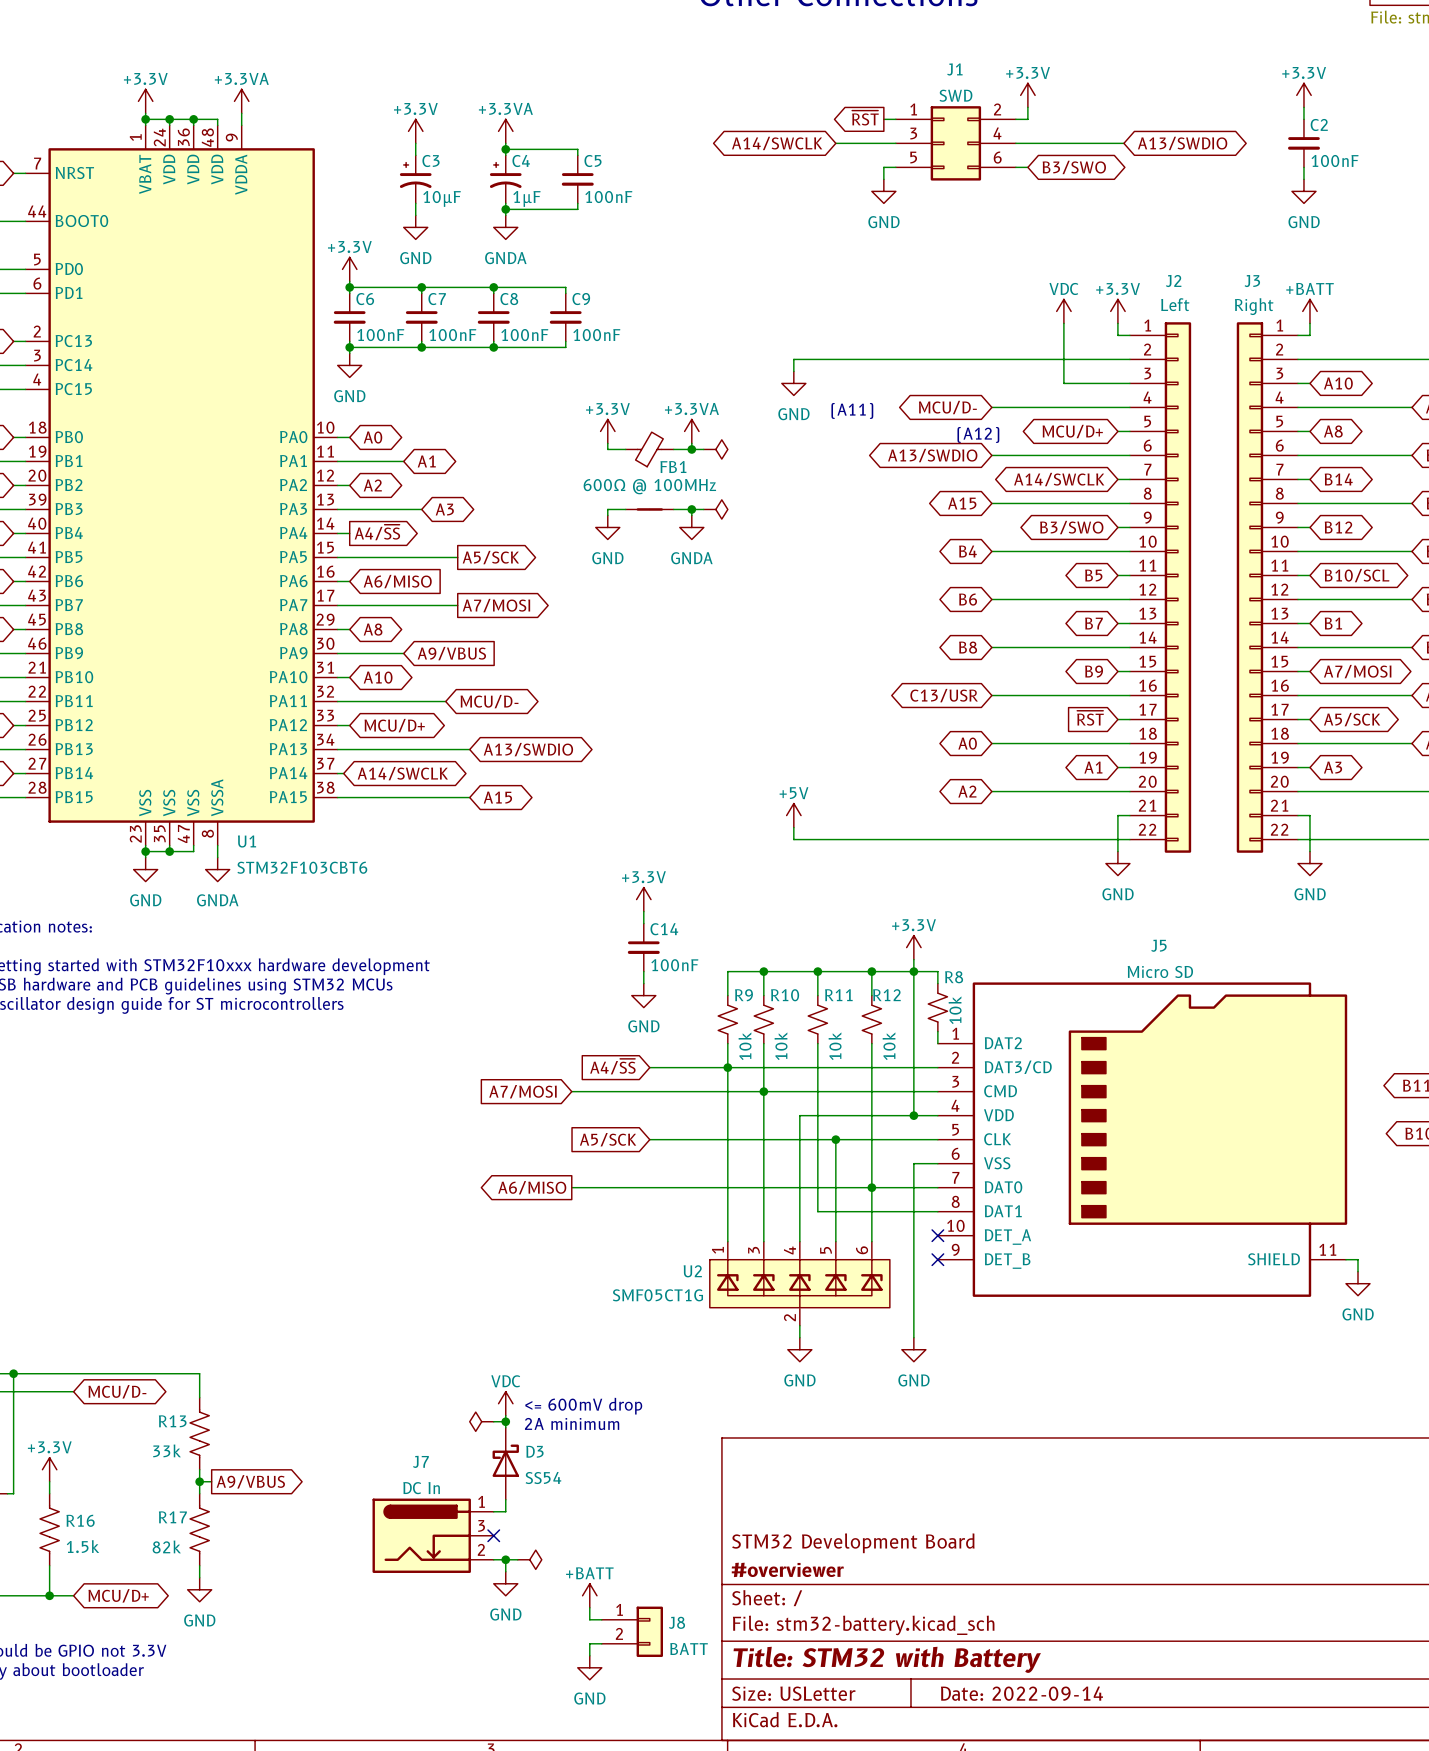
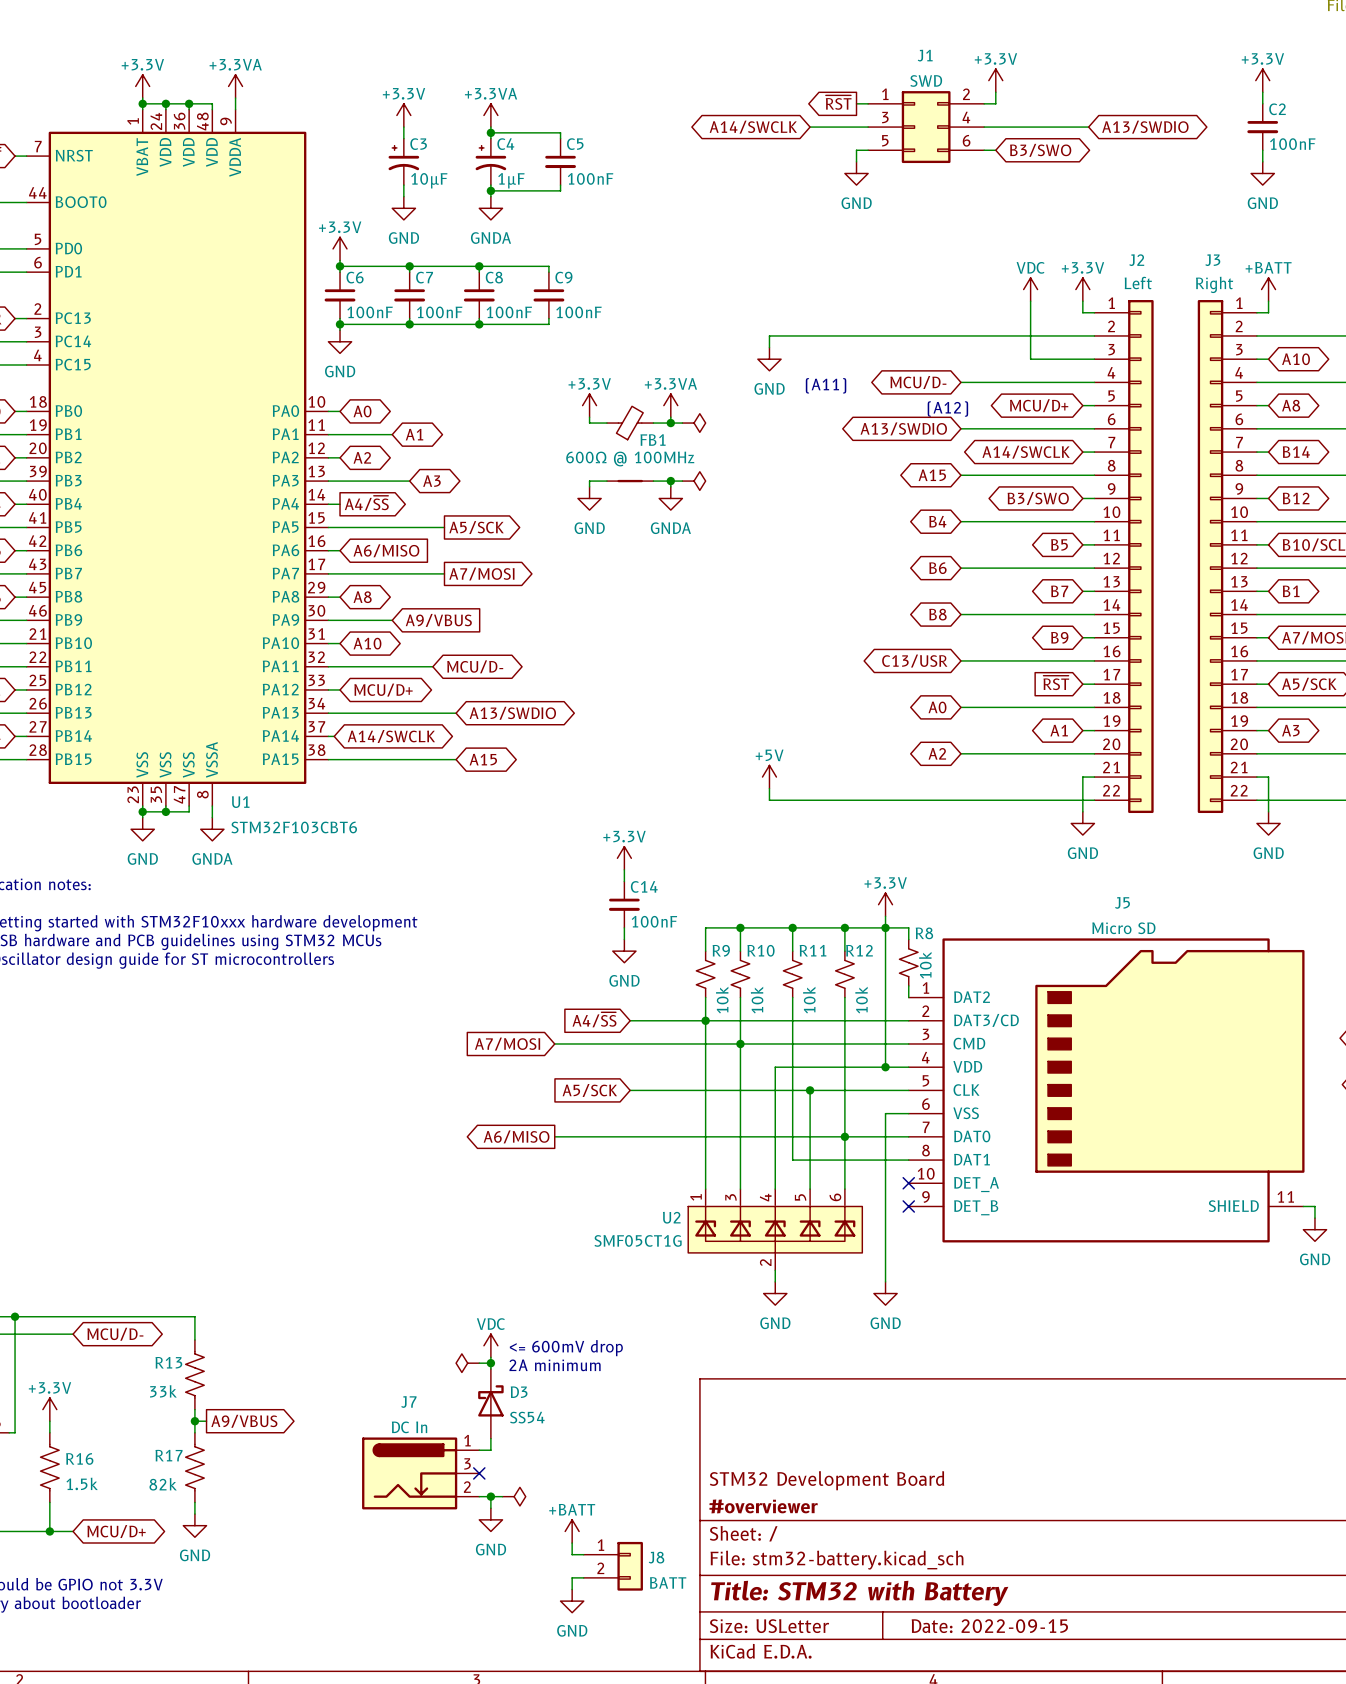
title block: Date: 2022-09-14 (1021, 1693) -> Date: 2022-09-15 (989, 1626)

